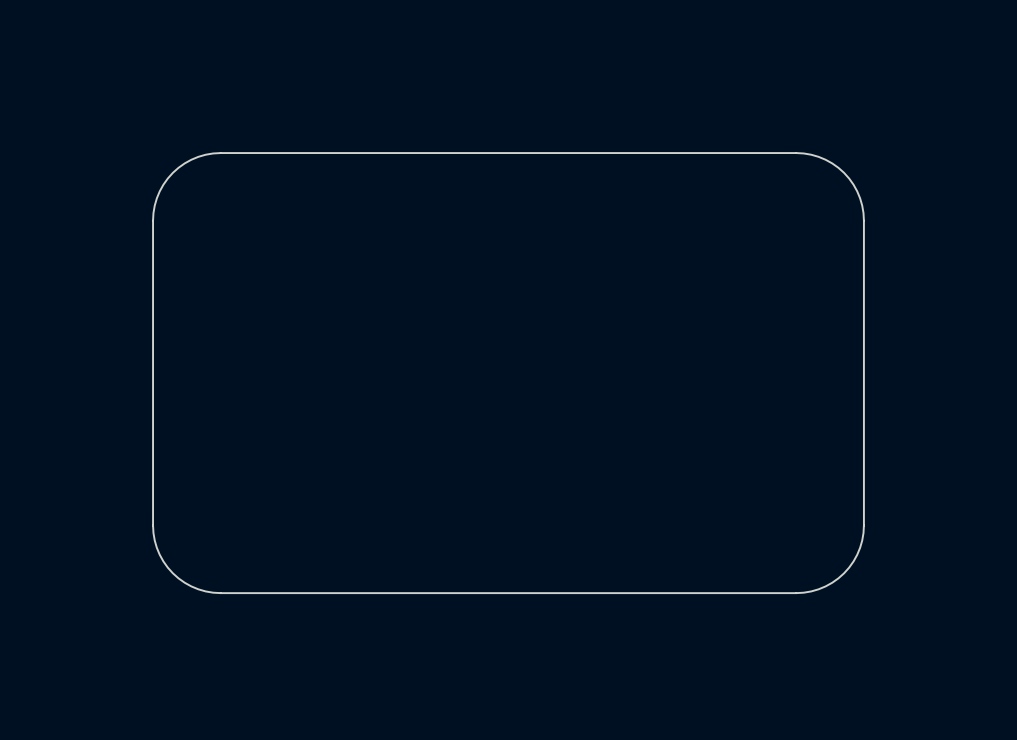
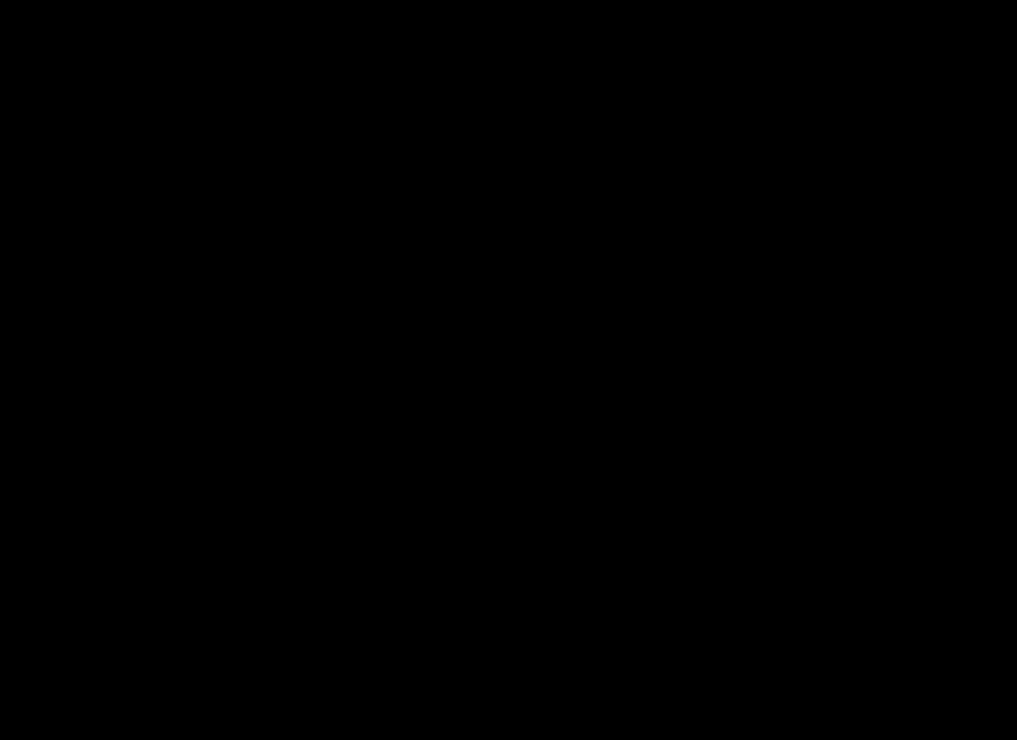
board edge: (796, 153) (220, 153) (205, 154) (184, 163) (172, 172) (163, 184) (156, 198) (153, 220) (153, 525) (156, 547) (163, 561) (172, 573) (191, 586) (205, 591) (220, 593) (796, 593) (818, 589) (832, 582) (844, 573) (853, 561) (860, 547) (863, 532) (863, 213) (857, 191) (844, 172) (825, 159) (811, 154) (796, 153) -> none

